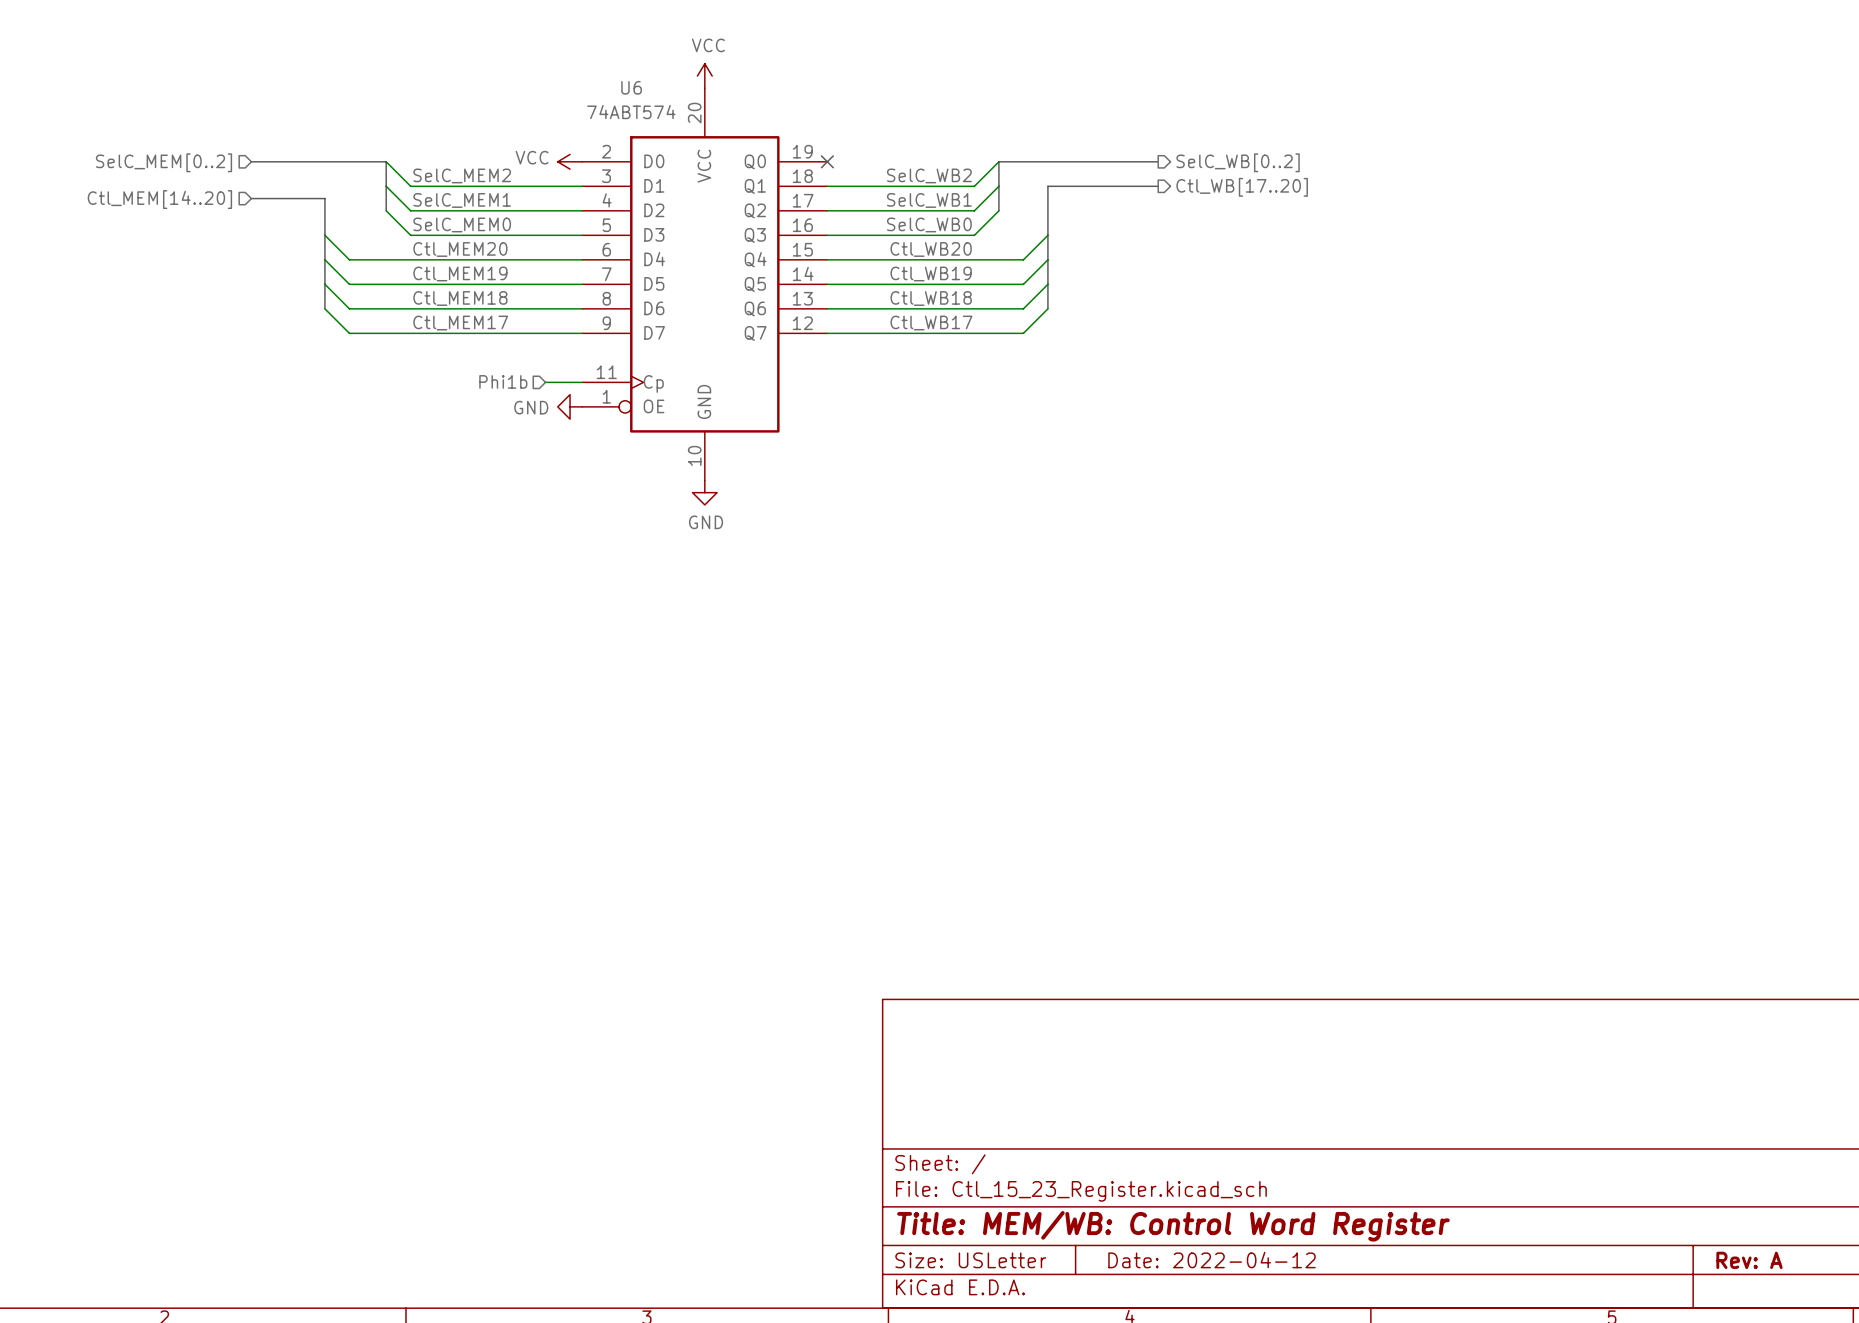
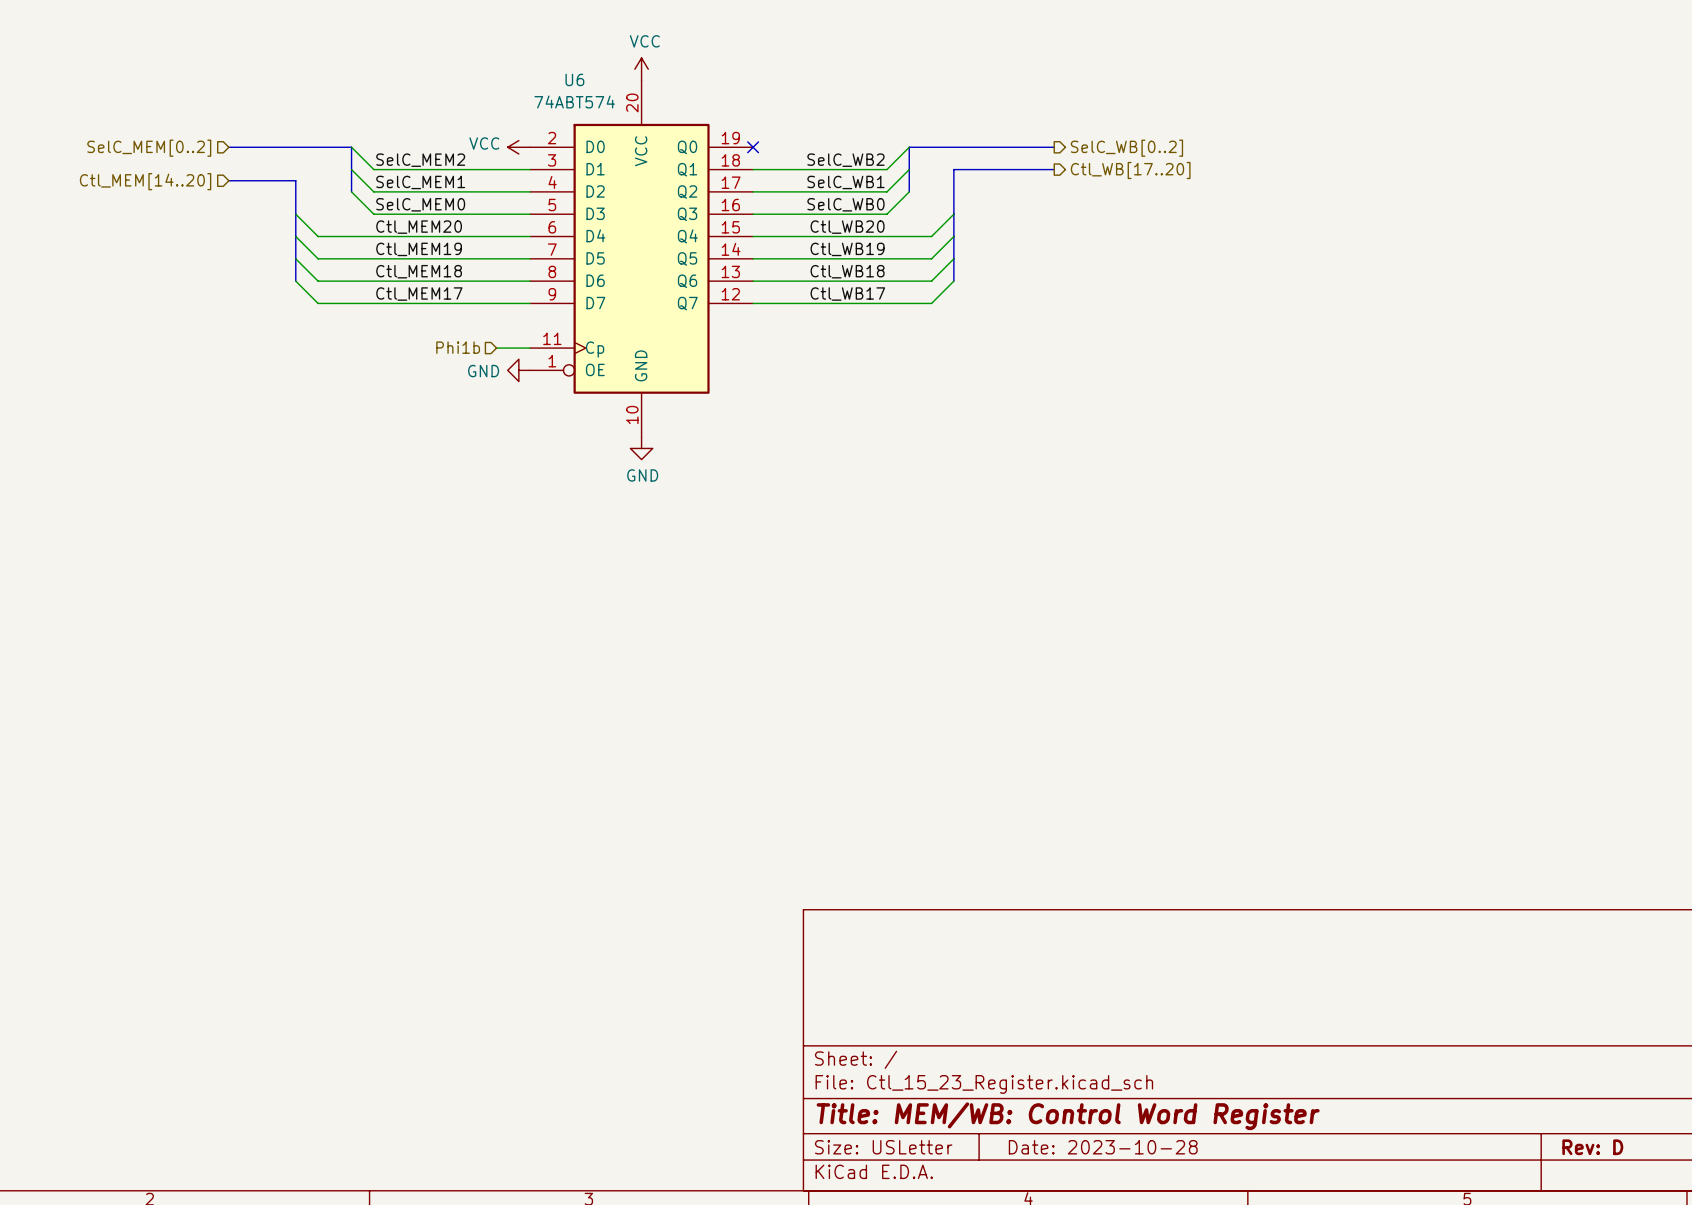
title block: Date: 2022-04-12 (1212, 1260) -> Date: 2023-10-28 (1103, 1147)
title block: Rev: A (1749, 1260) -> Rev: D (1592, 1147)

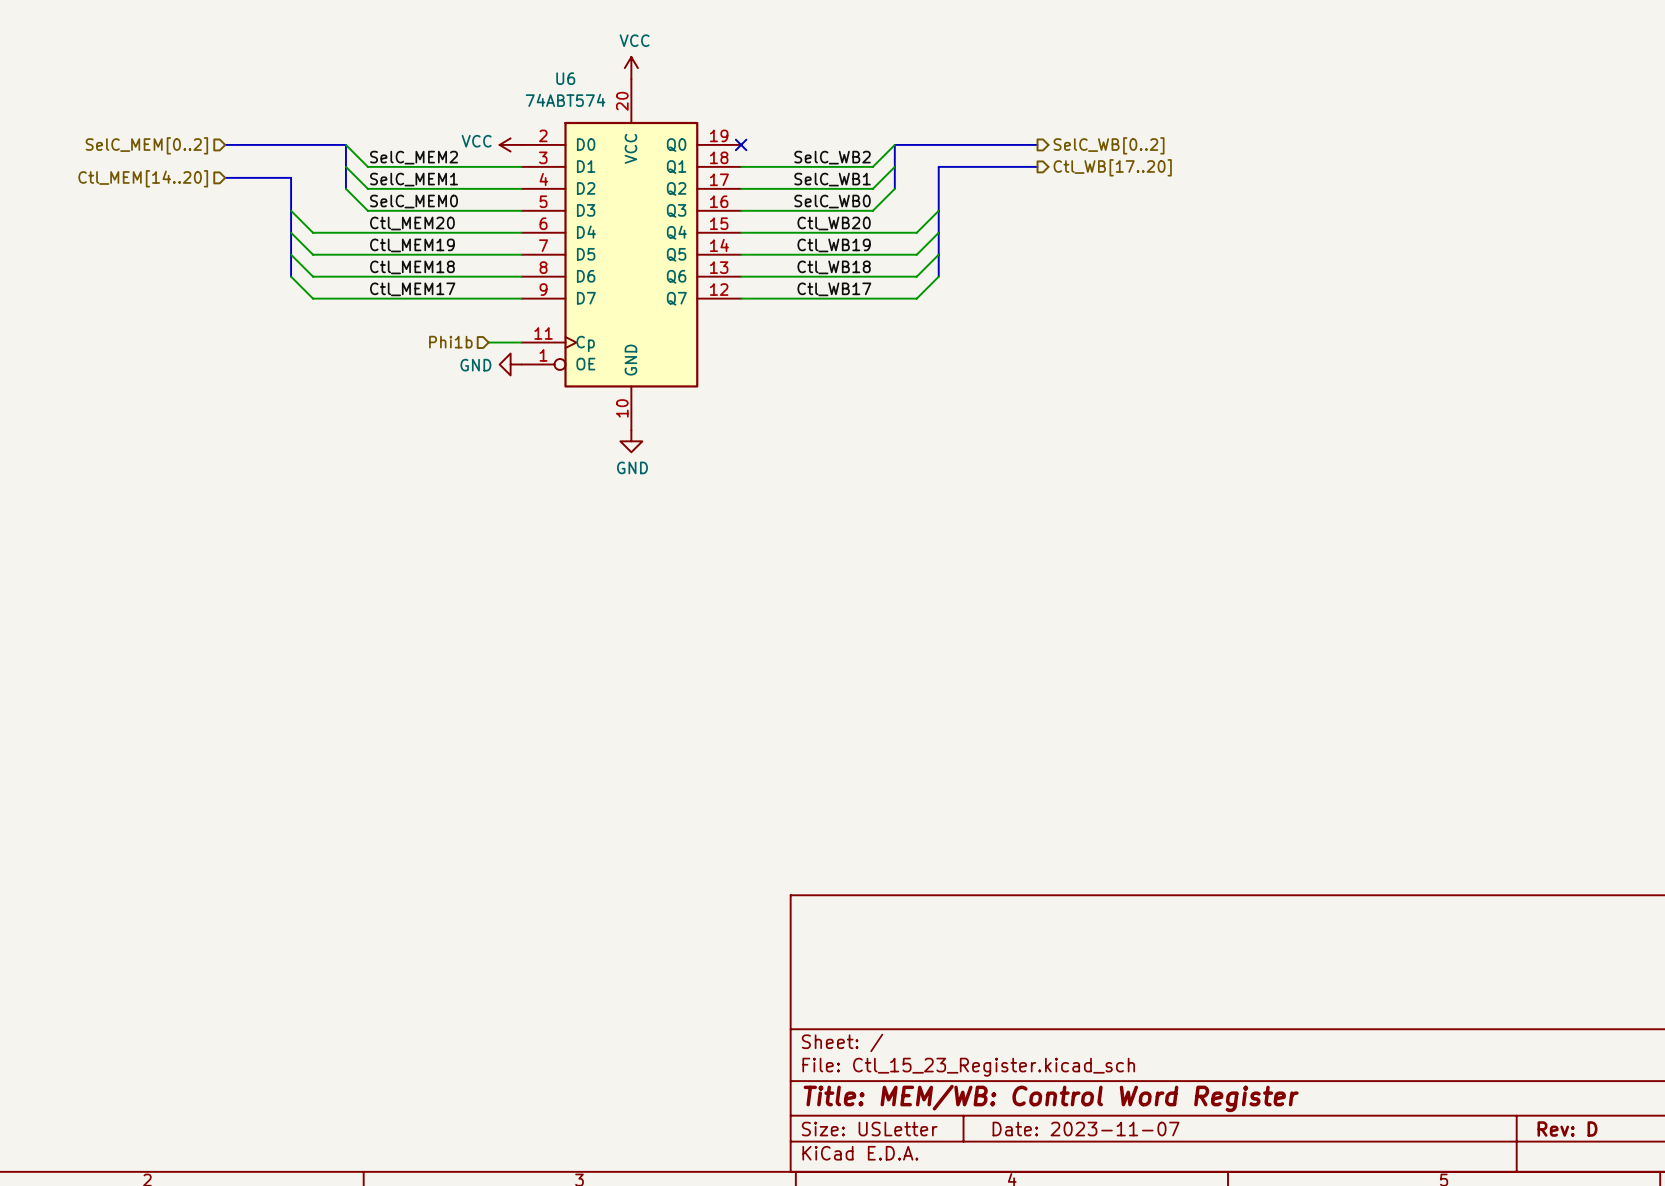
title block: Date: 2023-10-28 (1103, 1147) -> Date: 2023-11-07 (1086, 1129)

